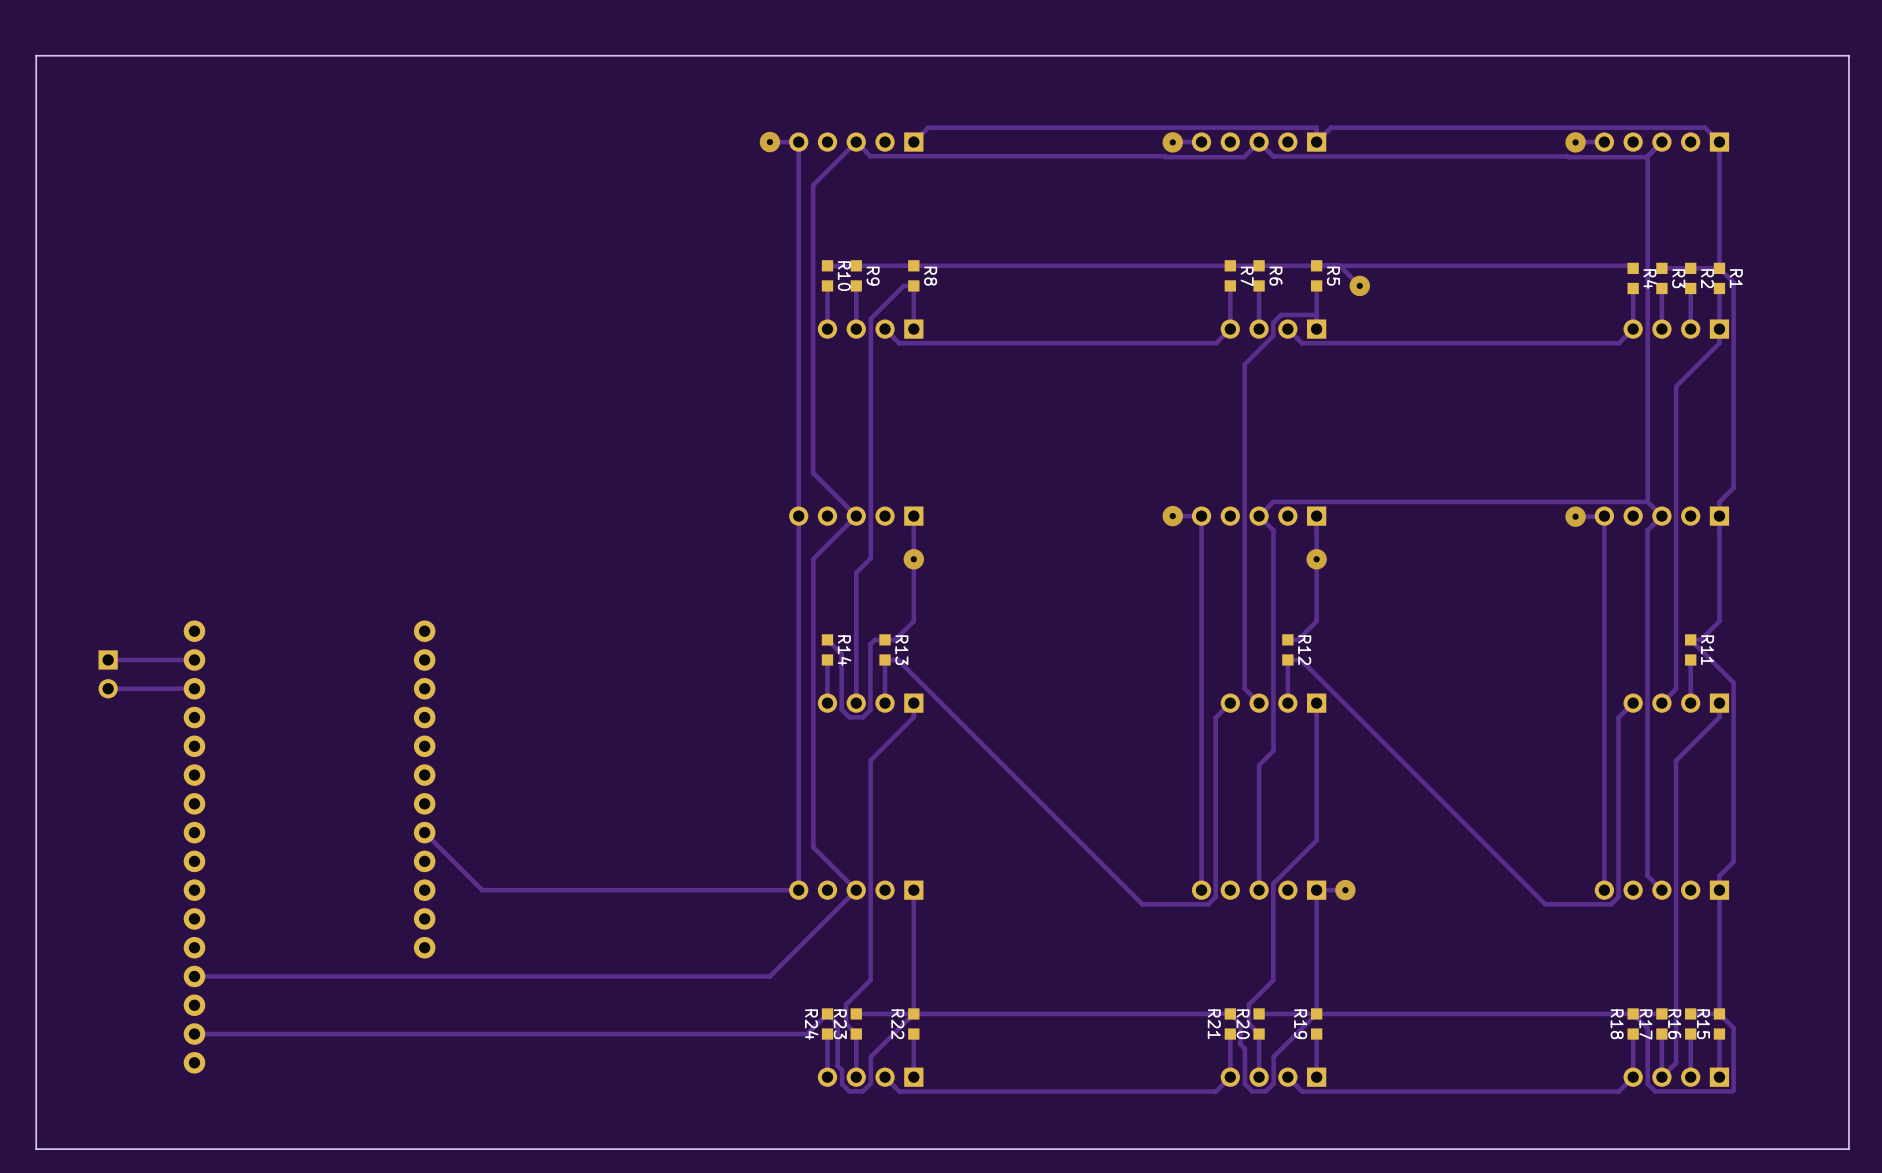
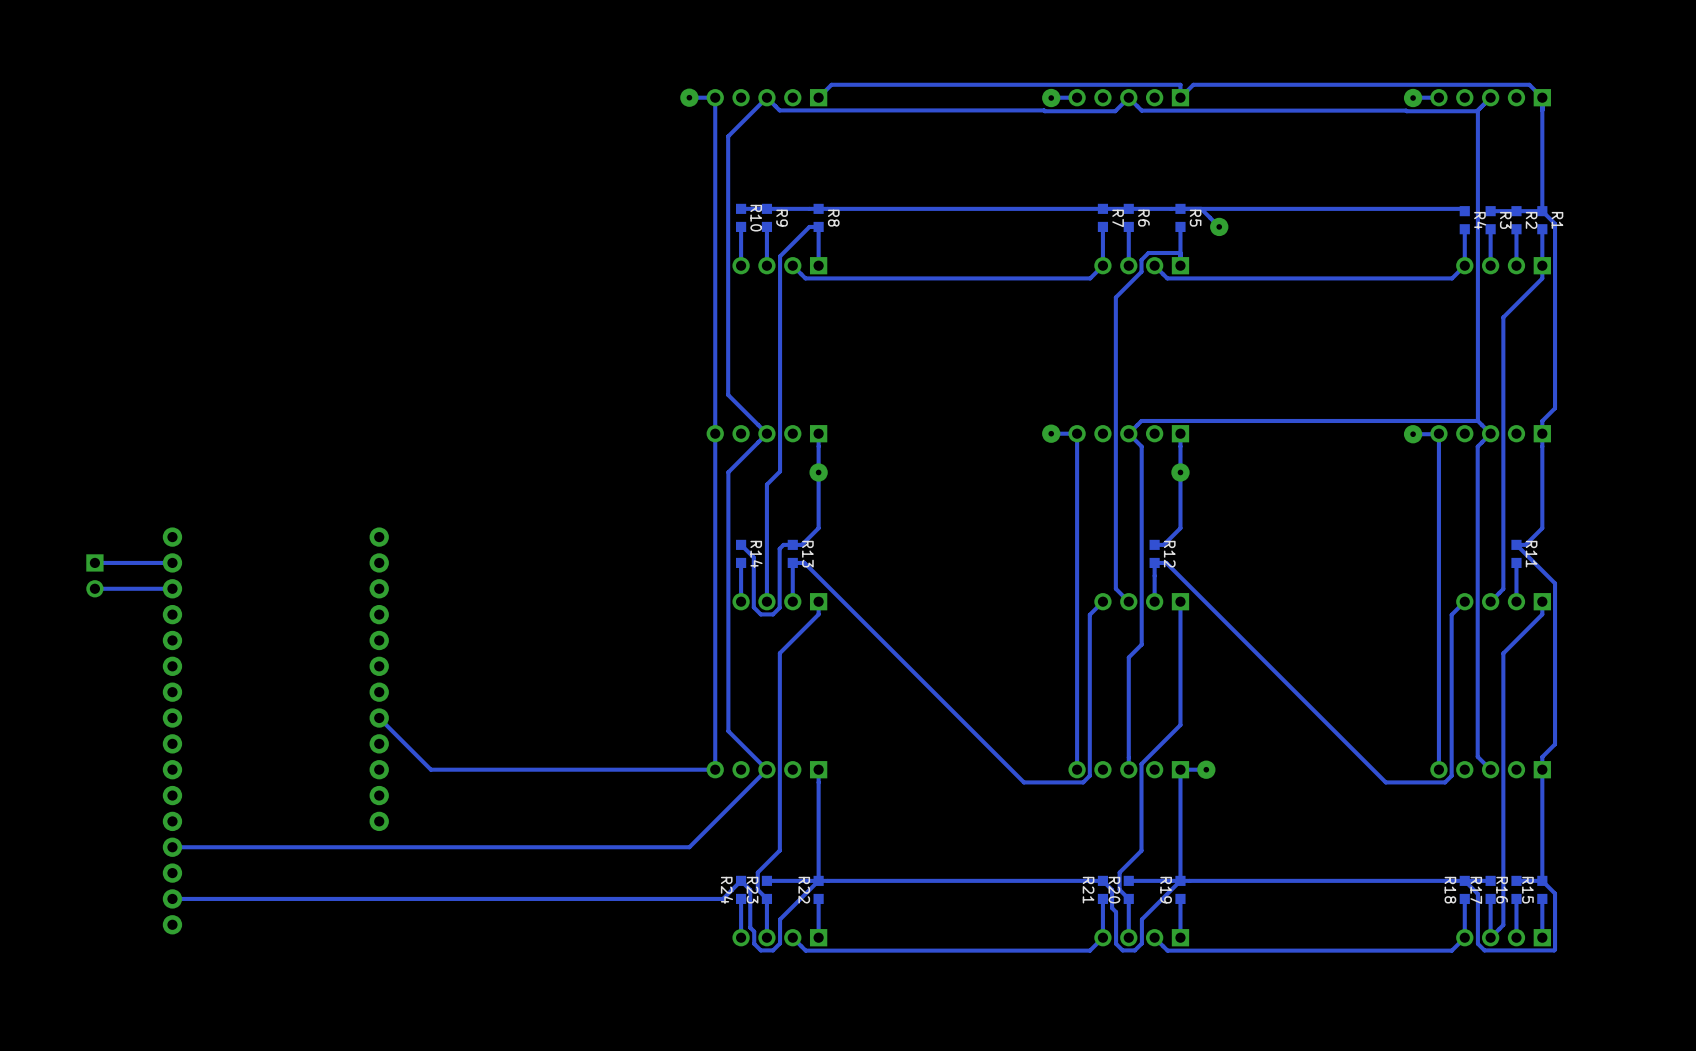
board edge: (1848, 55) (36, 55) (36, 1149) (1848, 1149) (1848, 55) -> none

